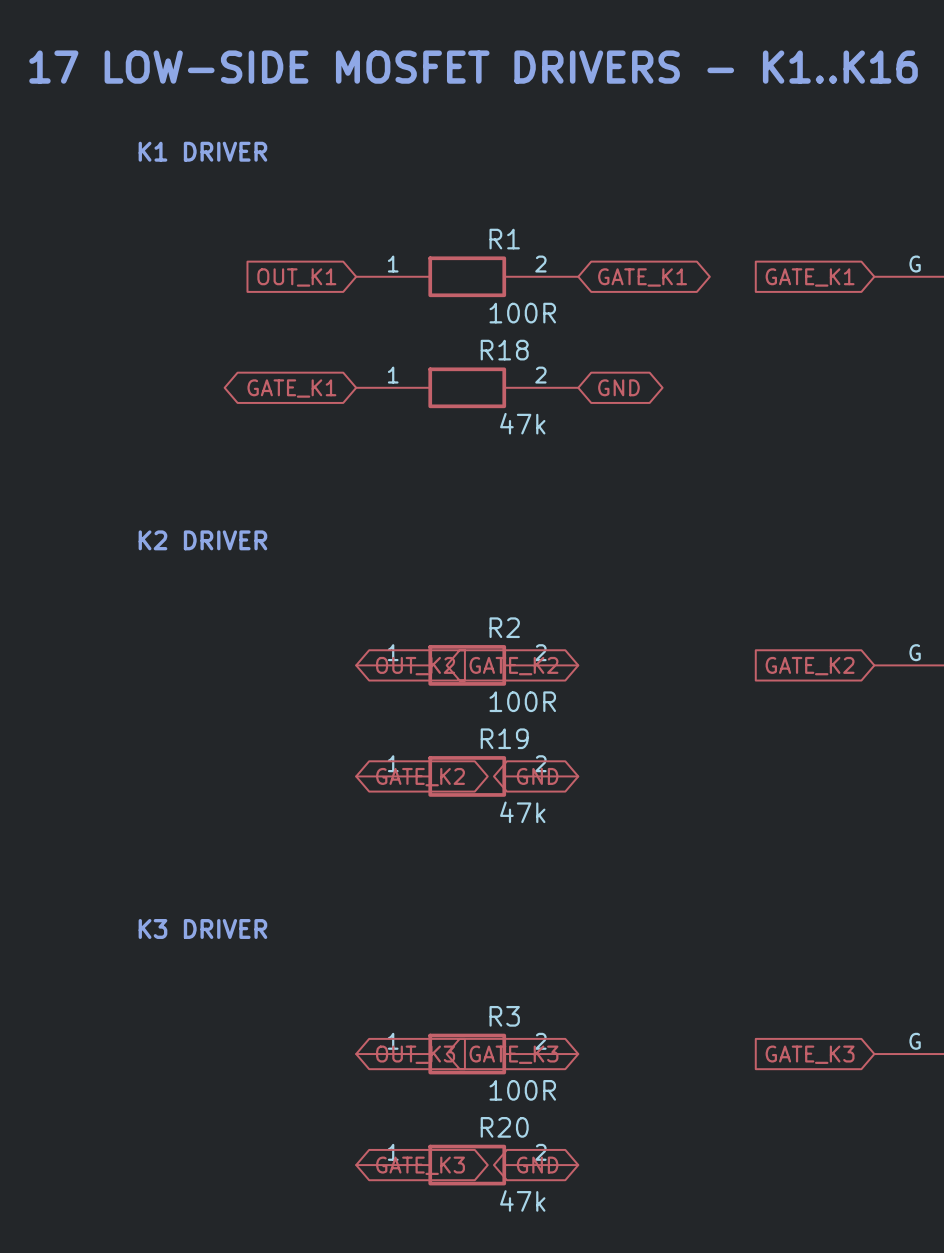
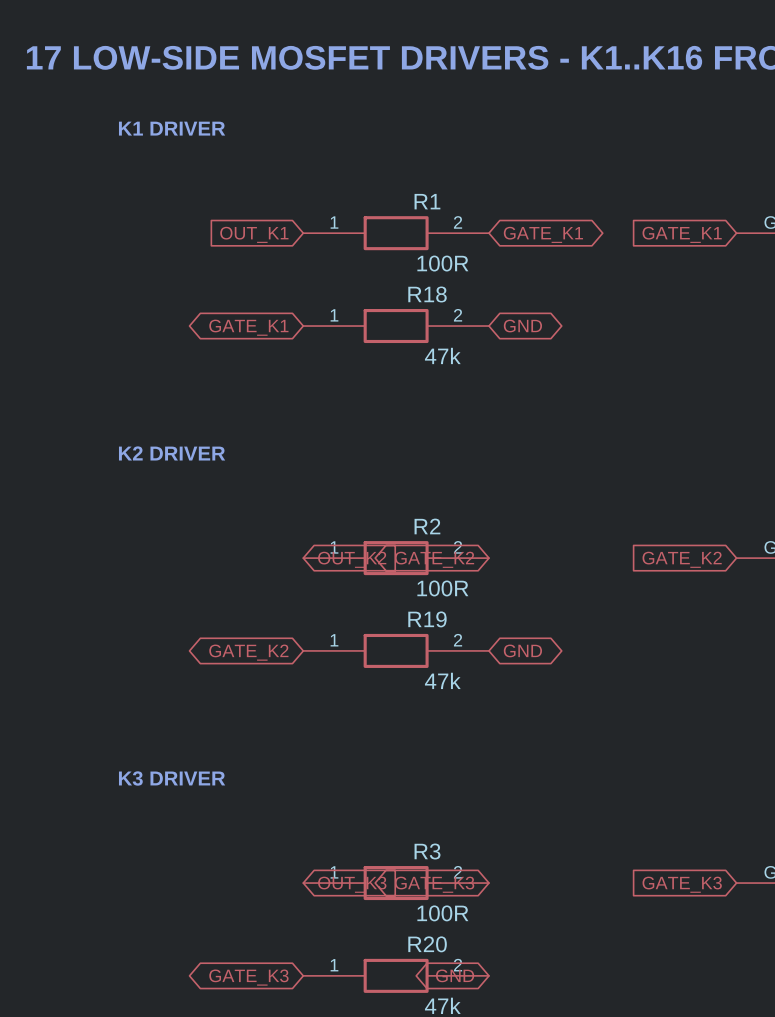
global label rotation: 0° (537, 776) -> 180° (522, 650)
global label rotation: 0° (420, 777) -> 180° (248, 652)
global label rotation: 0° (420, 1165) -> 180° (248, 977)

